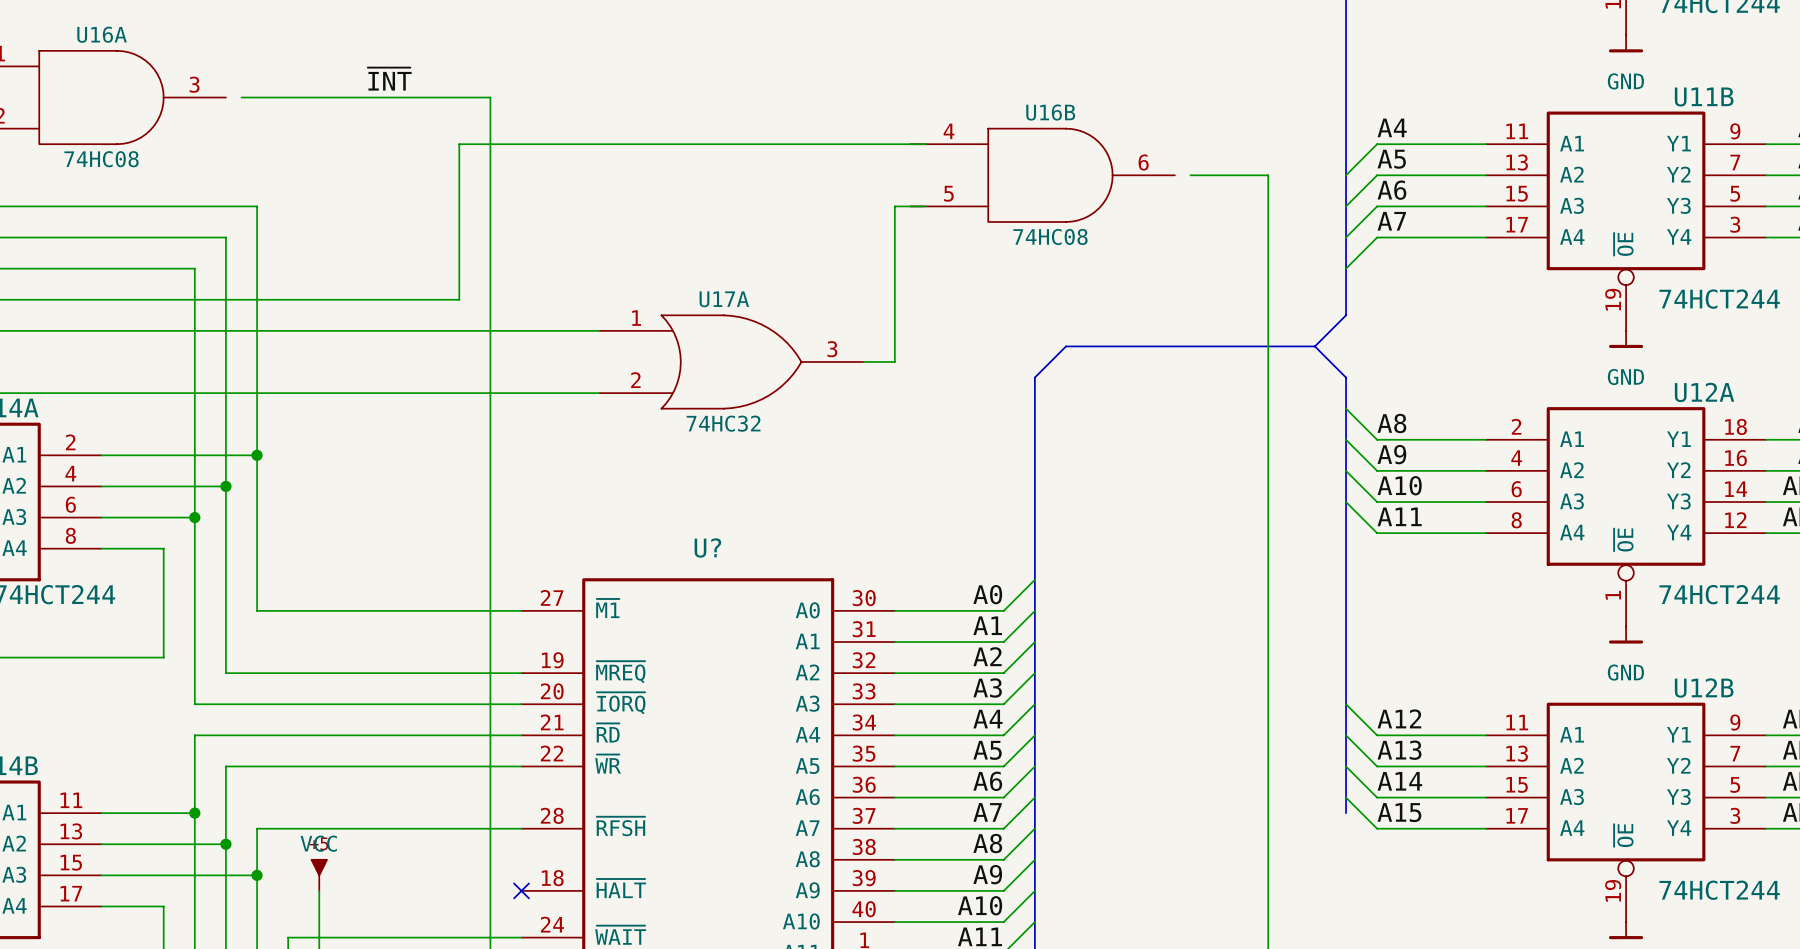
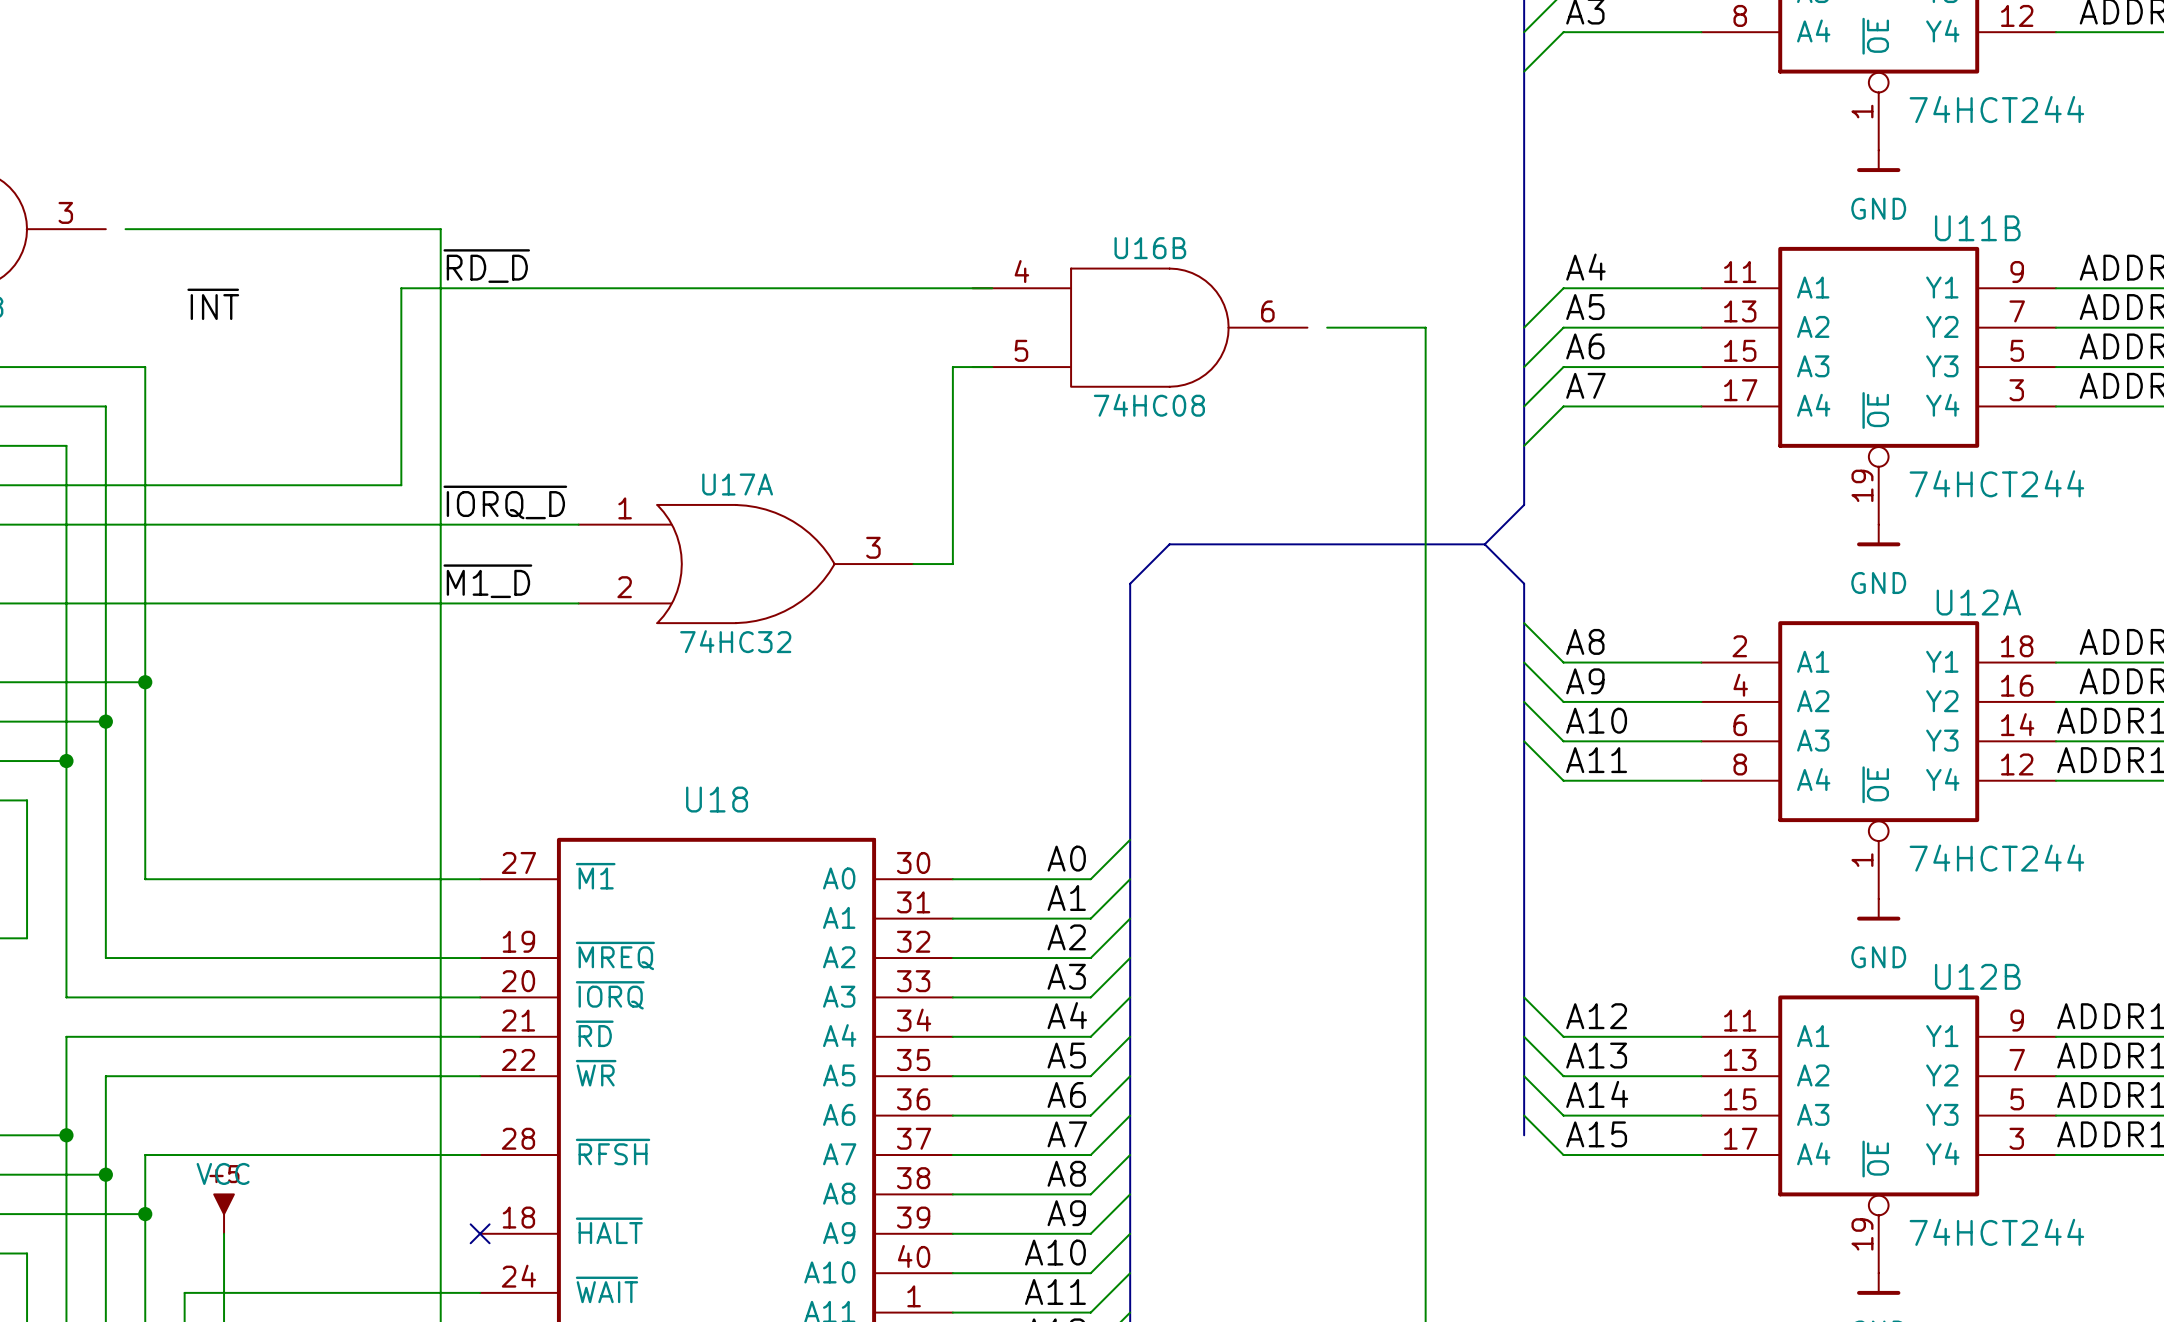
label position: ~{INT} (389, 79) -> ~{INT} (213, 304)
label: none -> ~{RD_D} (486, 266)
label: none -> ~{IORQ_D} (505, 502)
label: none -> ~{M1_D} (487, 581)
U? name: U? (707, 547) -> U18 (717, 799)

